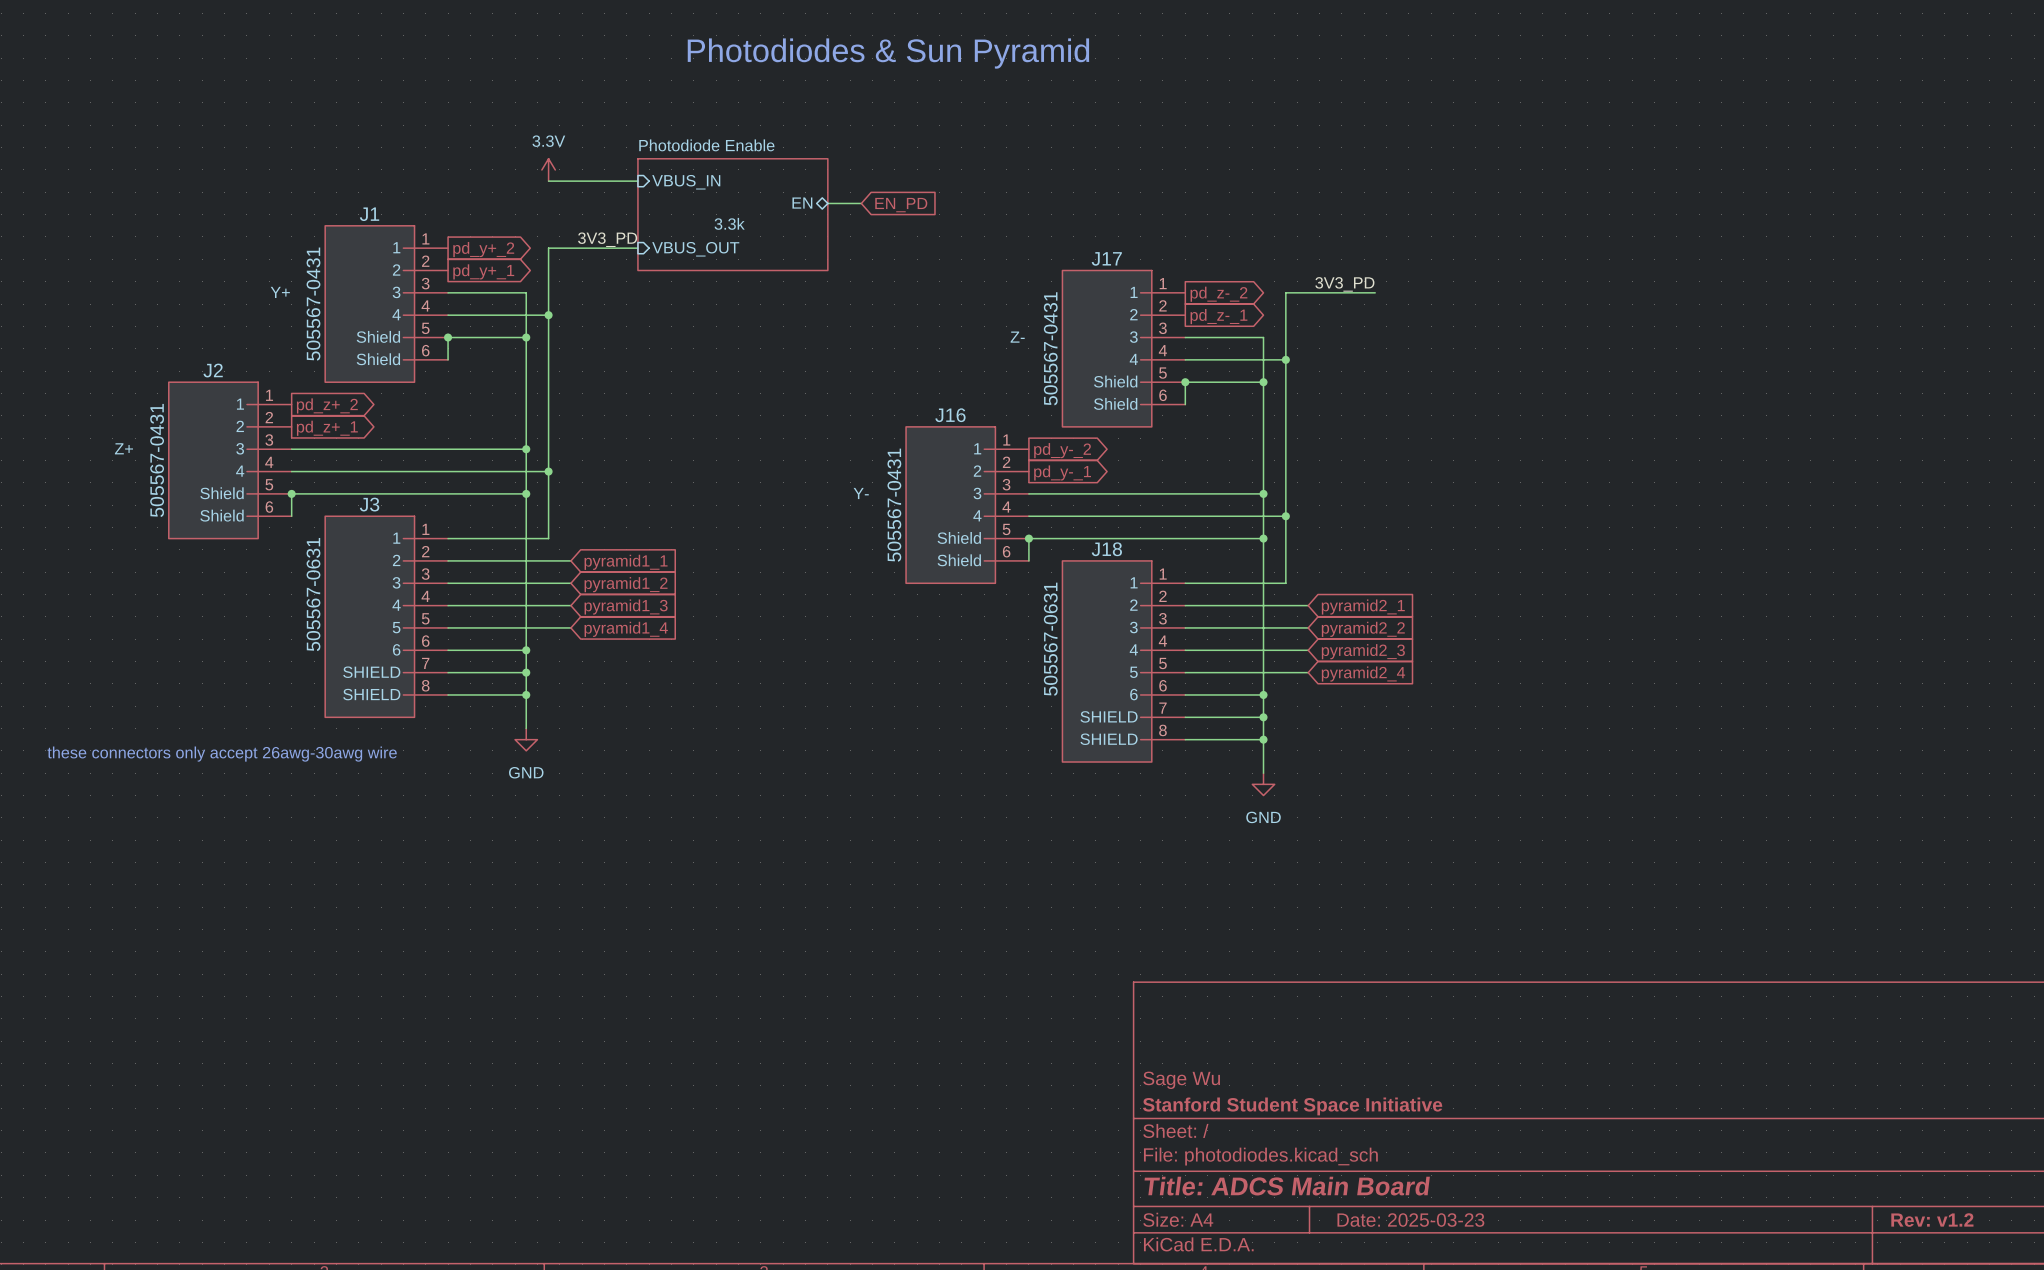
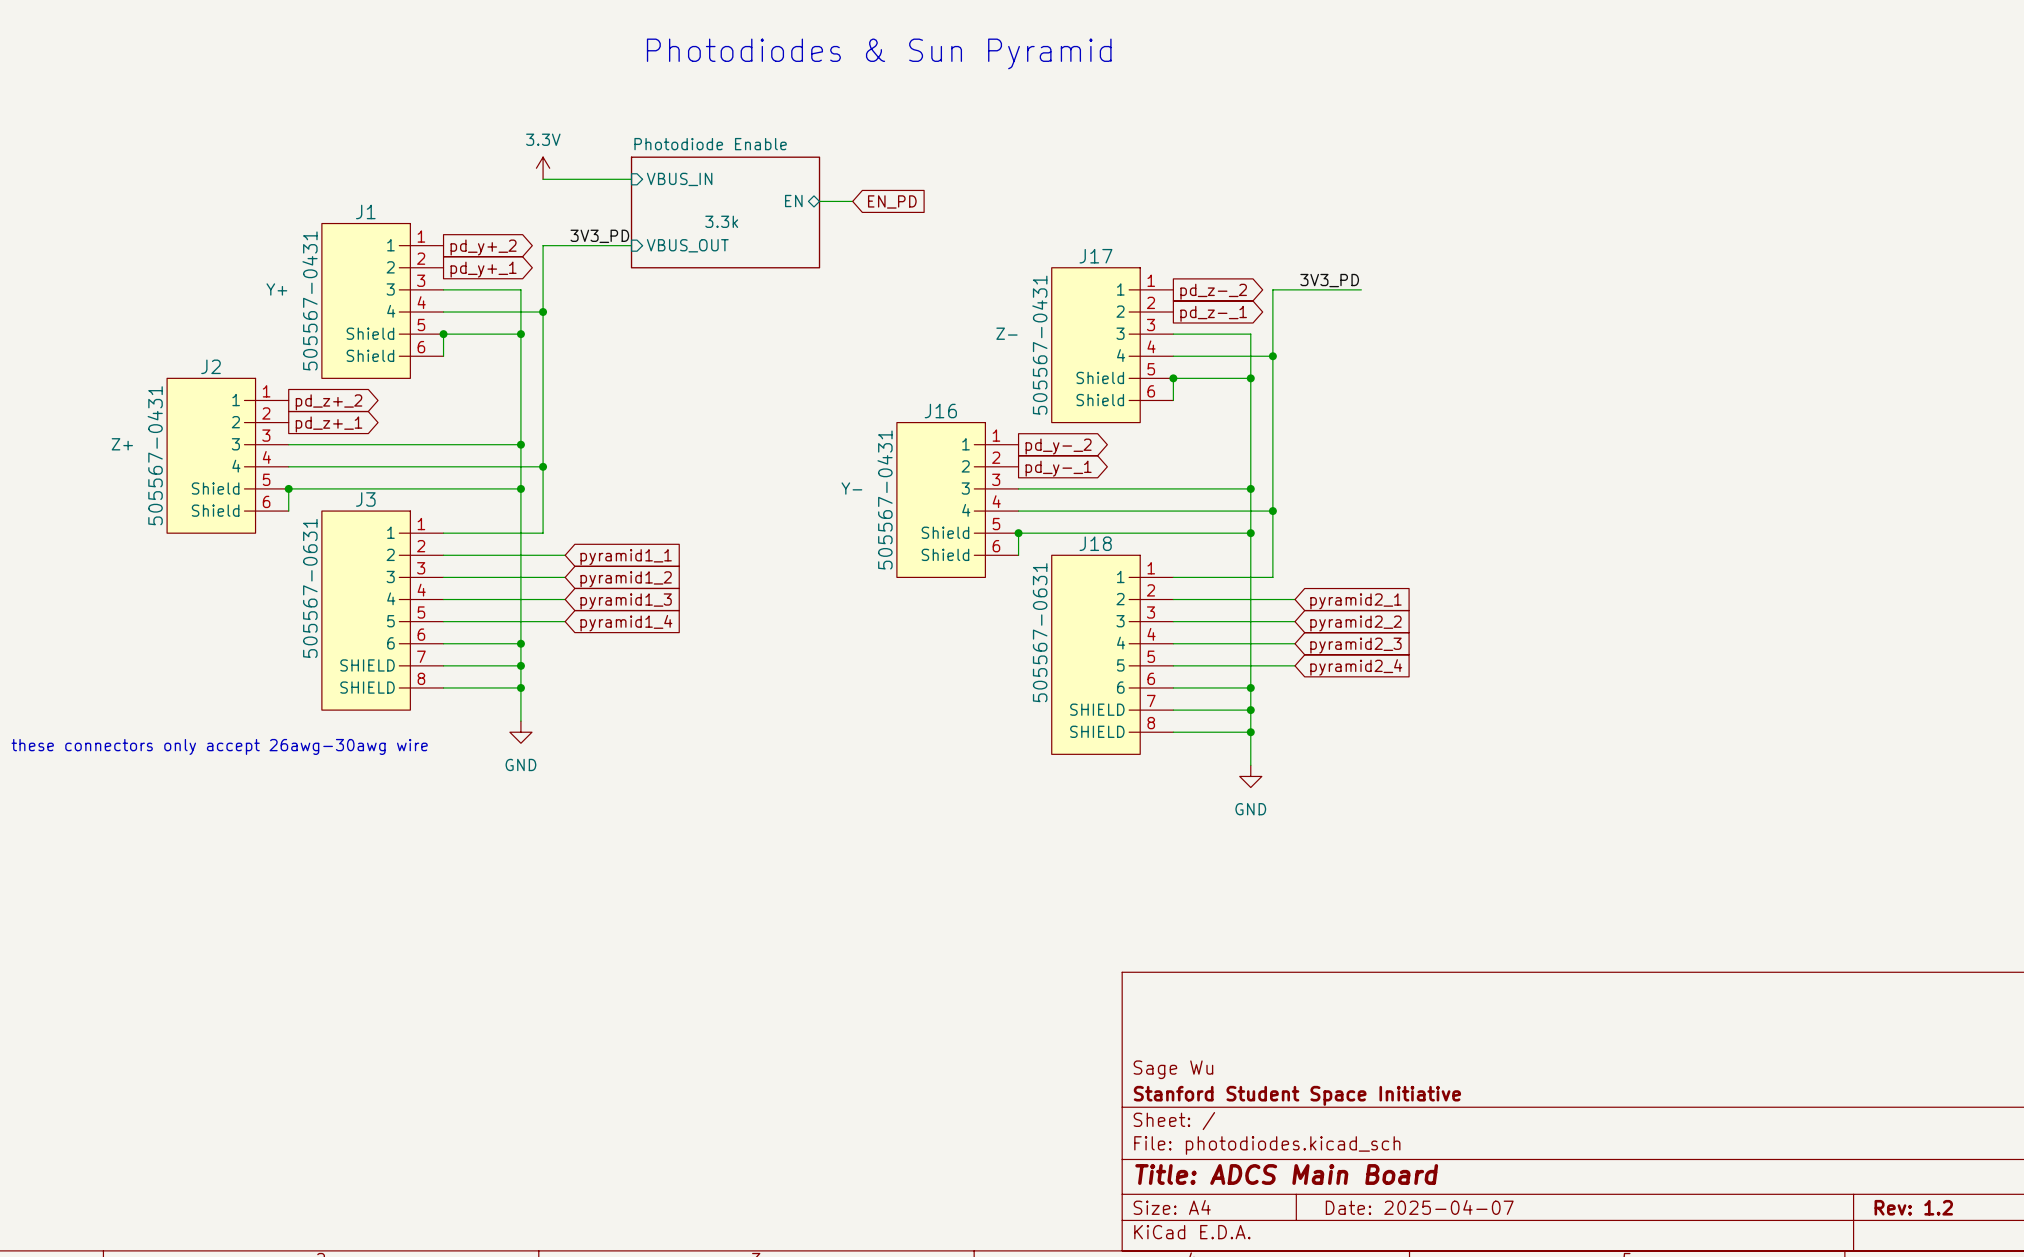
title block: Date: 2025-03-23 (1410, 1220) -> Date: 2025-04-07 (1419, 1207)
title block: Rev: v1.2 (1932, 1220) -> Rev: 1.2 (1913, 1207)

